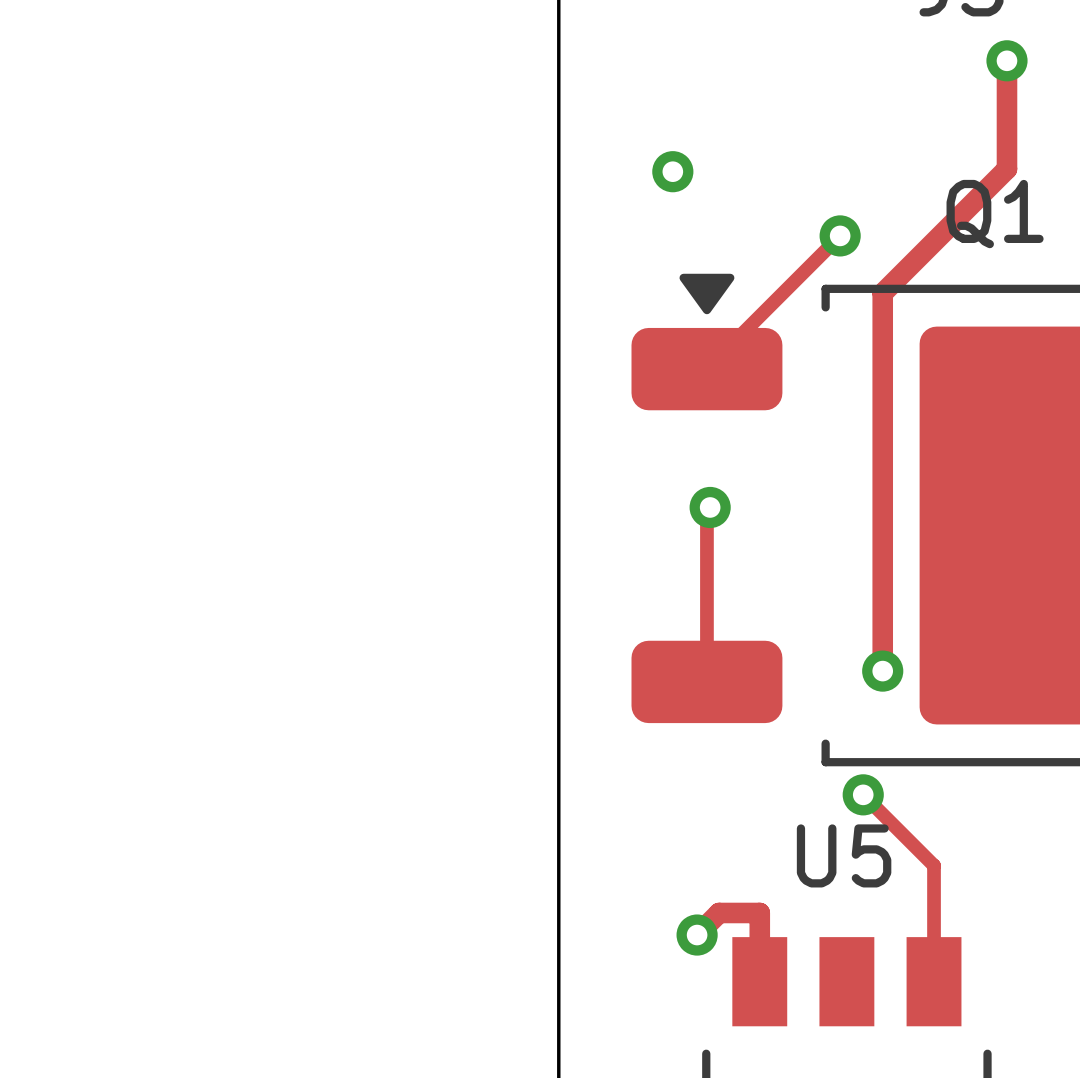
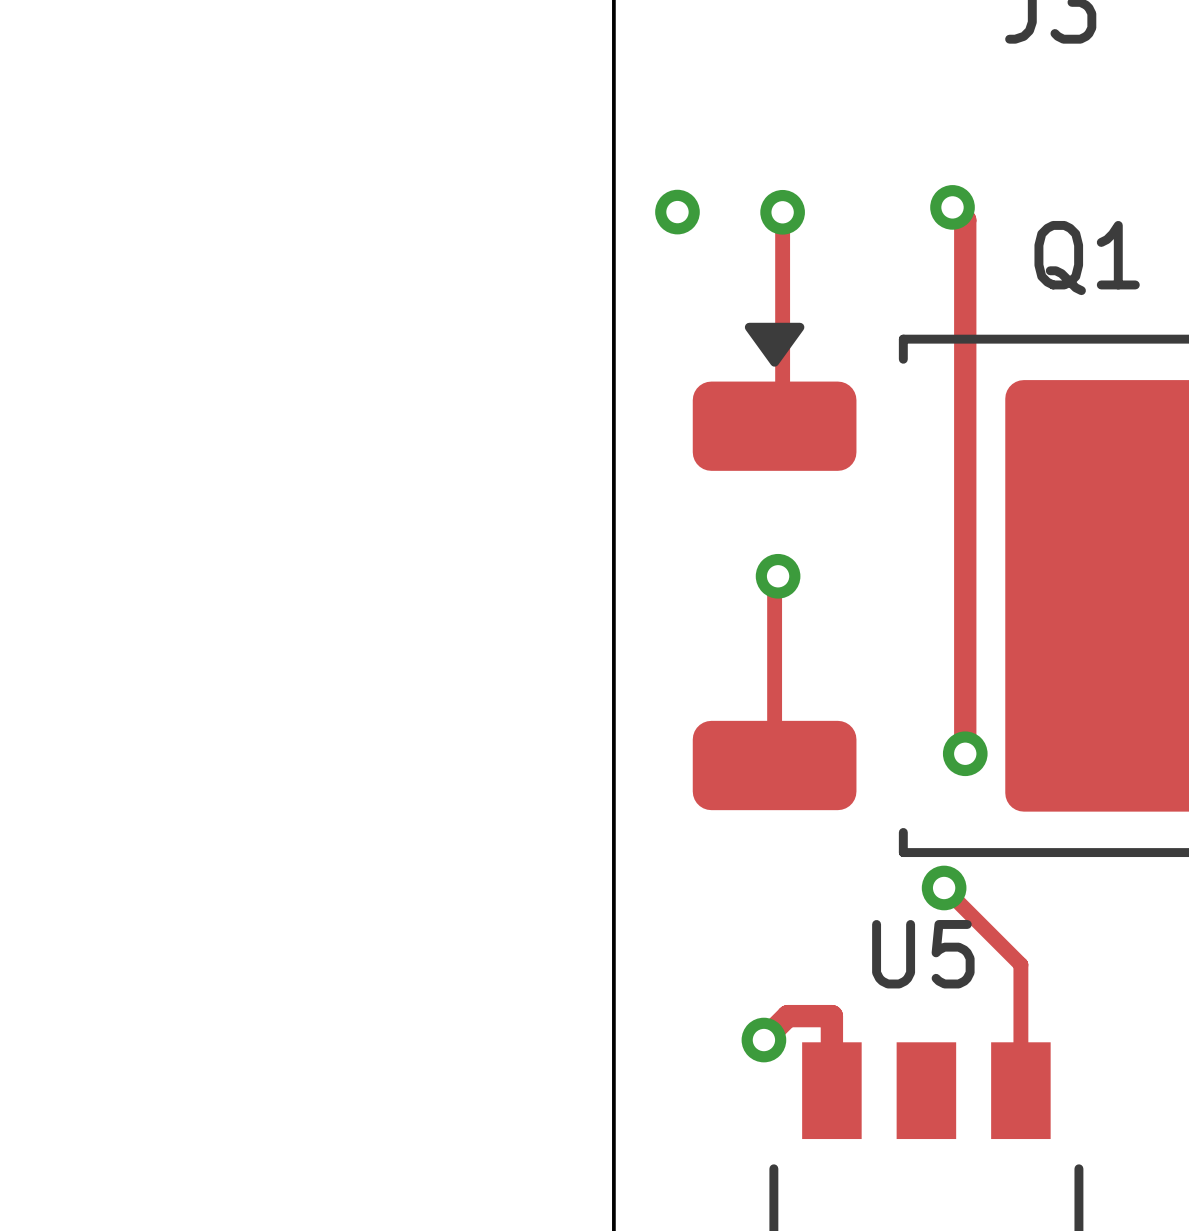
track: (1006, 60) (1006, 169) (882, 293) -> (952, 207) (965, 220) (965, 344)
via: (1006, 60) -> none
via: none -> (952, 207)
via: none -> (677, 212)
via: (672, 171) -> none
via: none -> (782, 212)
track: (840, 235) (714, 361) -> (782, 212) (782, 418)
via: (840, 235) -> none

